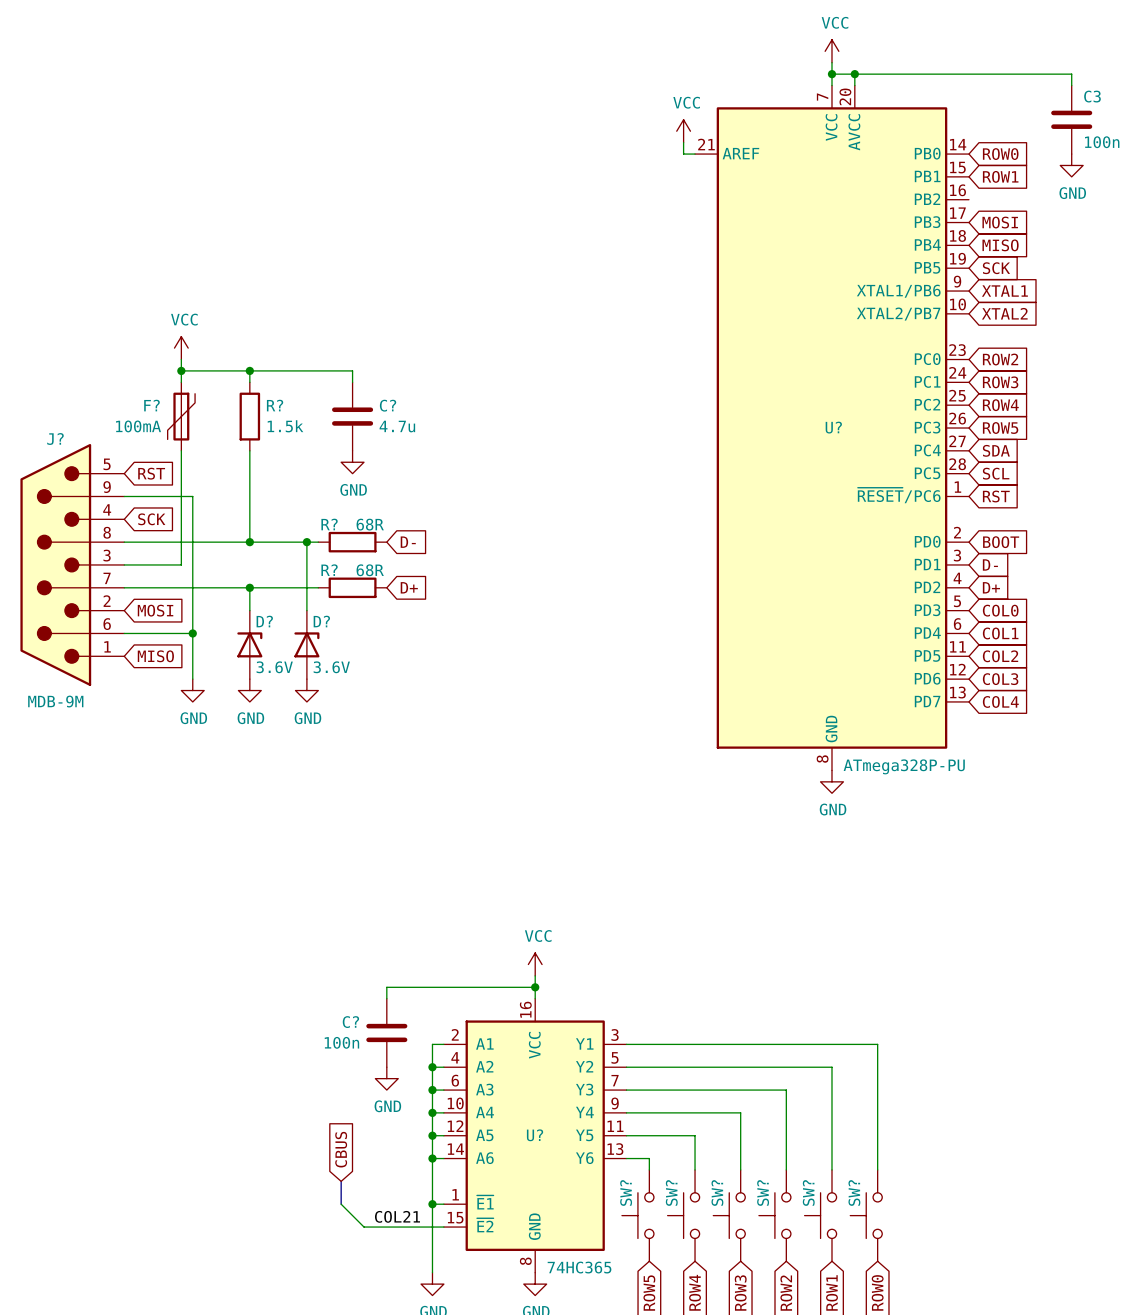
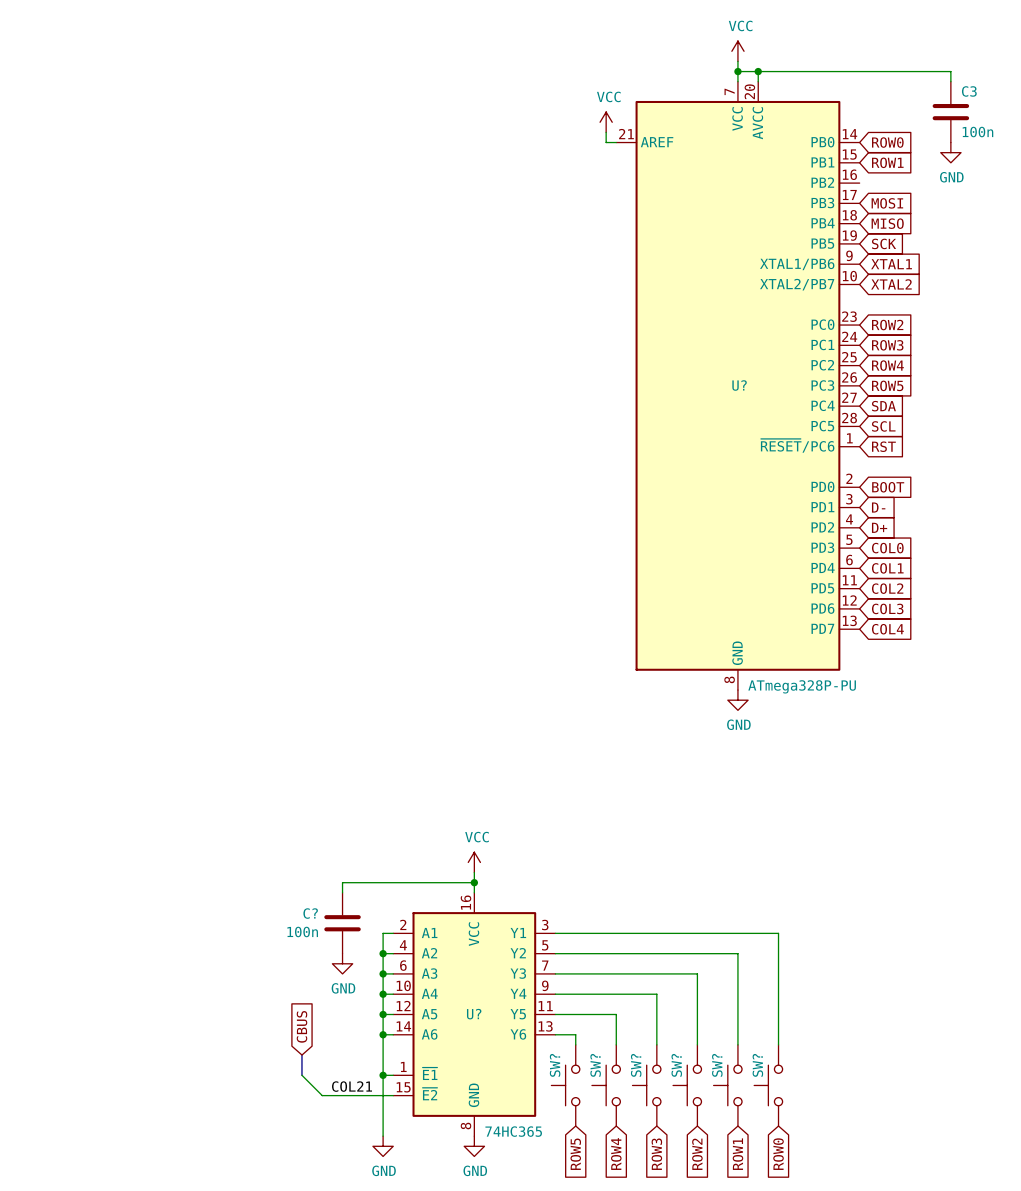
power symbol: VCC (181, 348) -> none
wire: (181, 359) (181, 382) -> none
wire: (181, 370) (352, 370) (352, 382) -> none
junction: (181, 370) -> none
wire: (249, 370) (249, 382) -> none
junction: (249, 370) -> none
F?: 100mA (181, 416) -> none
R?: 1.5k (249, 416) -> none
C?: 4.7u (352, 416) -> none
wire: (181, 450) (181, 564) (124, 564) -> none
wire: (249, 450) (249, 542) -> none
power symbol: GND (352, 462) -> none
global label: RST (151, 473) -> none
wire: (124, 496) (192, 496) (192, 679) -> none
global label: SCK (151, 519) -> none
wire: (124, 542) (318, 542) -> none
junction: (249, 542) -> none
wire: (306, 542) (306, 610) -> none
junction: (306, 542) -> none
R?: 68R (352, 542) -> none
global label: D- (408, 542) -> none
J?: MDB-9M (72, 564) -> none
wire: (124, 587) (318, 587) -> none
wire: (249, 587) (249, 610) -> none
junction: (249, 587) -> none
R?: 68R (352, 587) -> none
global label: D+ (409, 587) -> none
global label: MOSI (155, 610) -> none
wire: (124, 633) (192, 633) -> none
junction: (192, 633) -> none
D?: 3.6V (249, 644) -> none
D?: 3.6V (306, 644) -> none
global label: MISO (155, 656) -> none
power symbol: GND (192, 690) -> none
power symbol: GND (249, 690) -> none
power symbol: GND (306, 690) -> none

